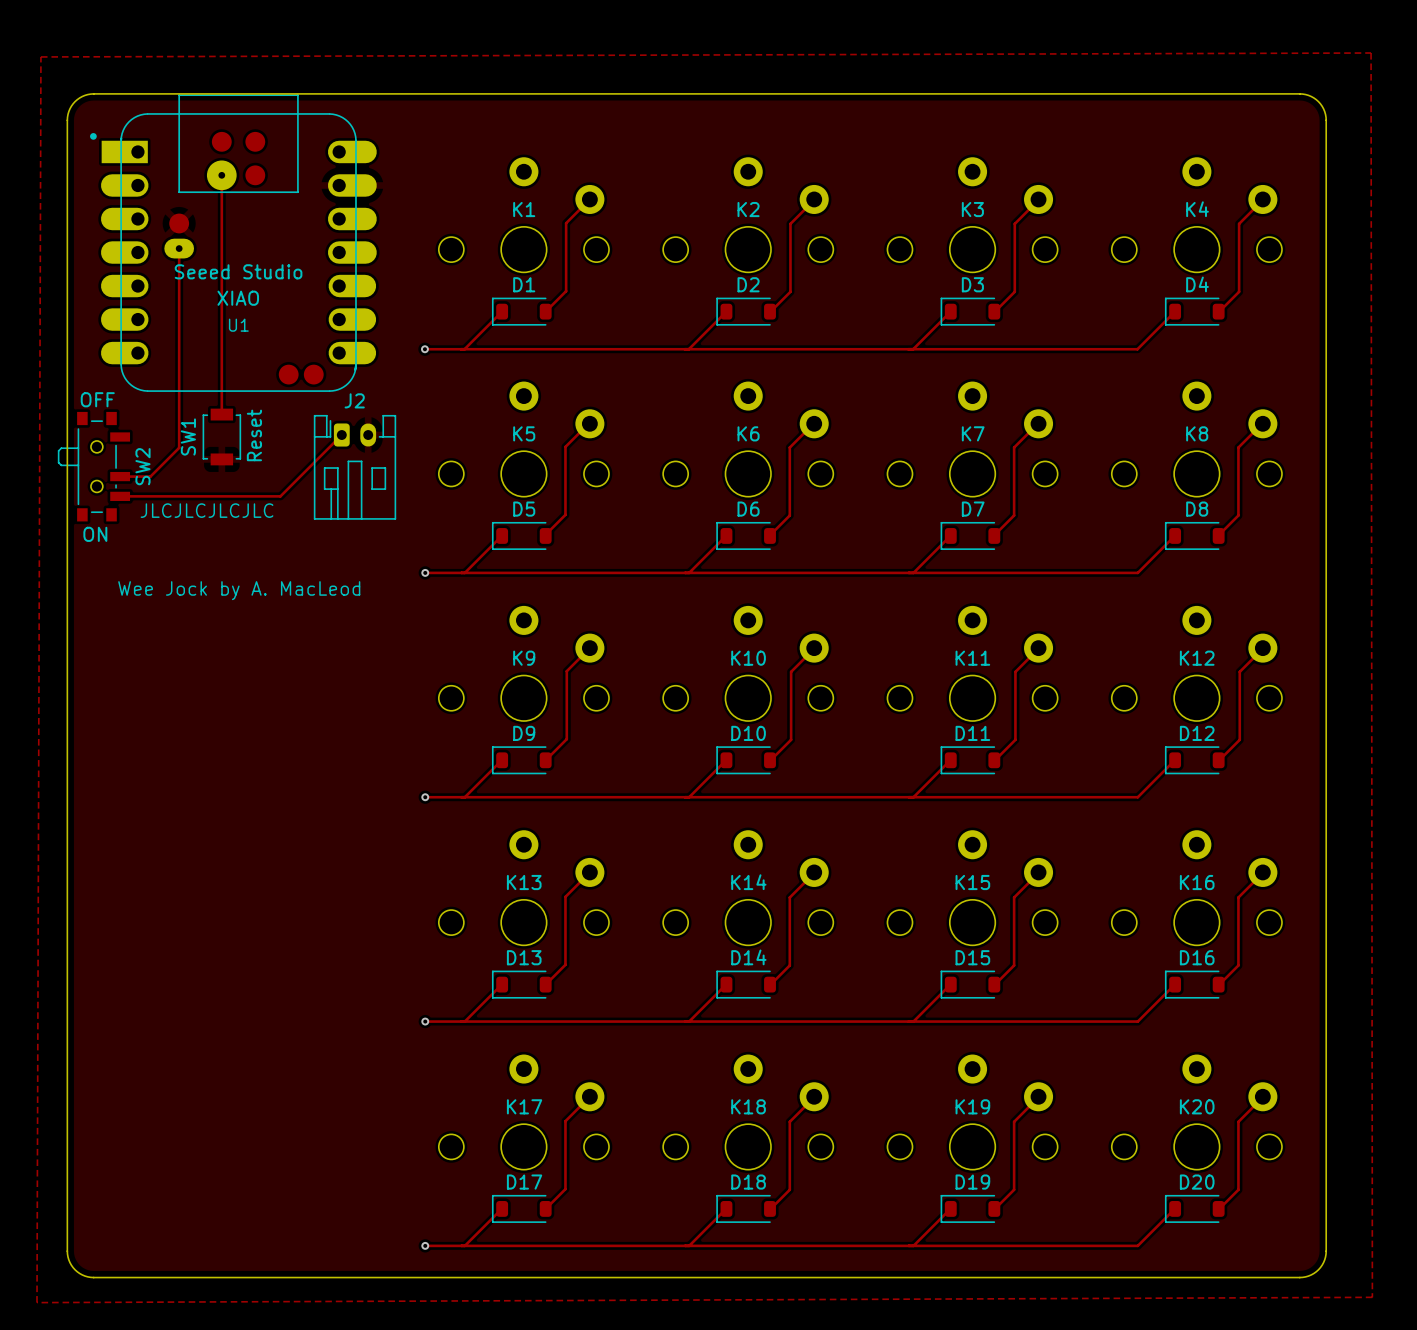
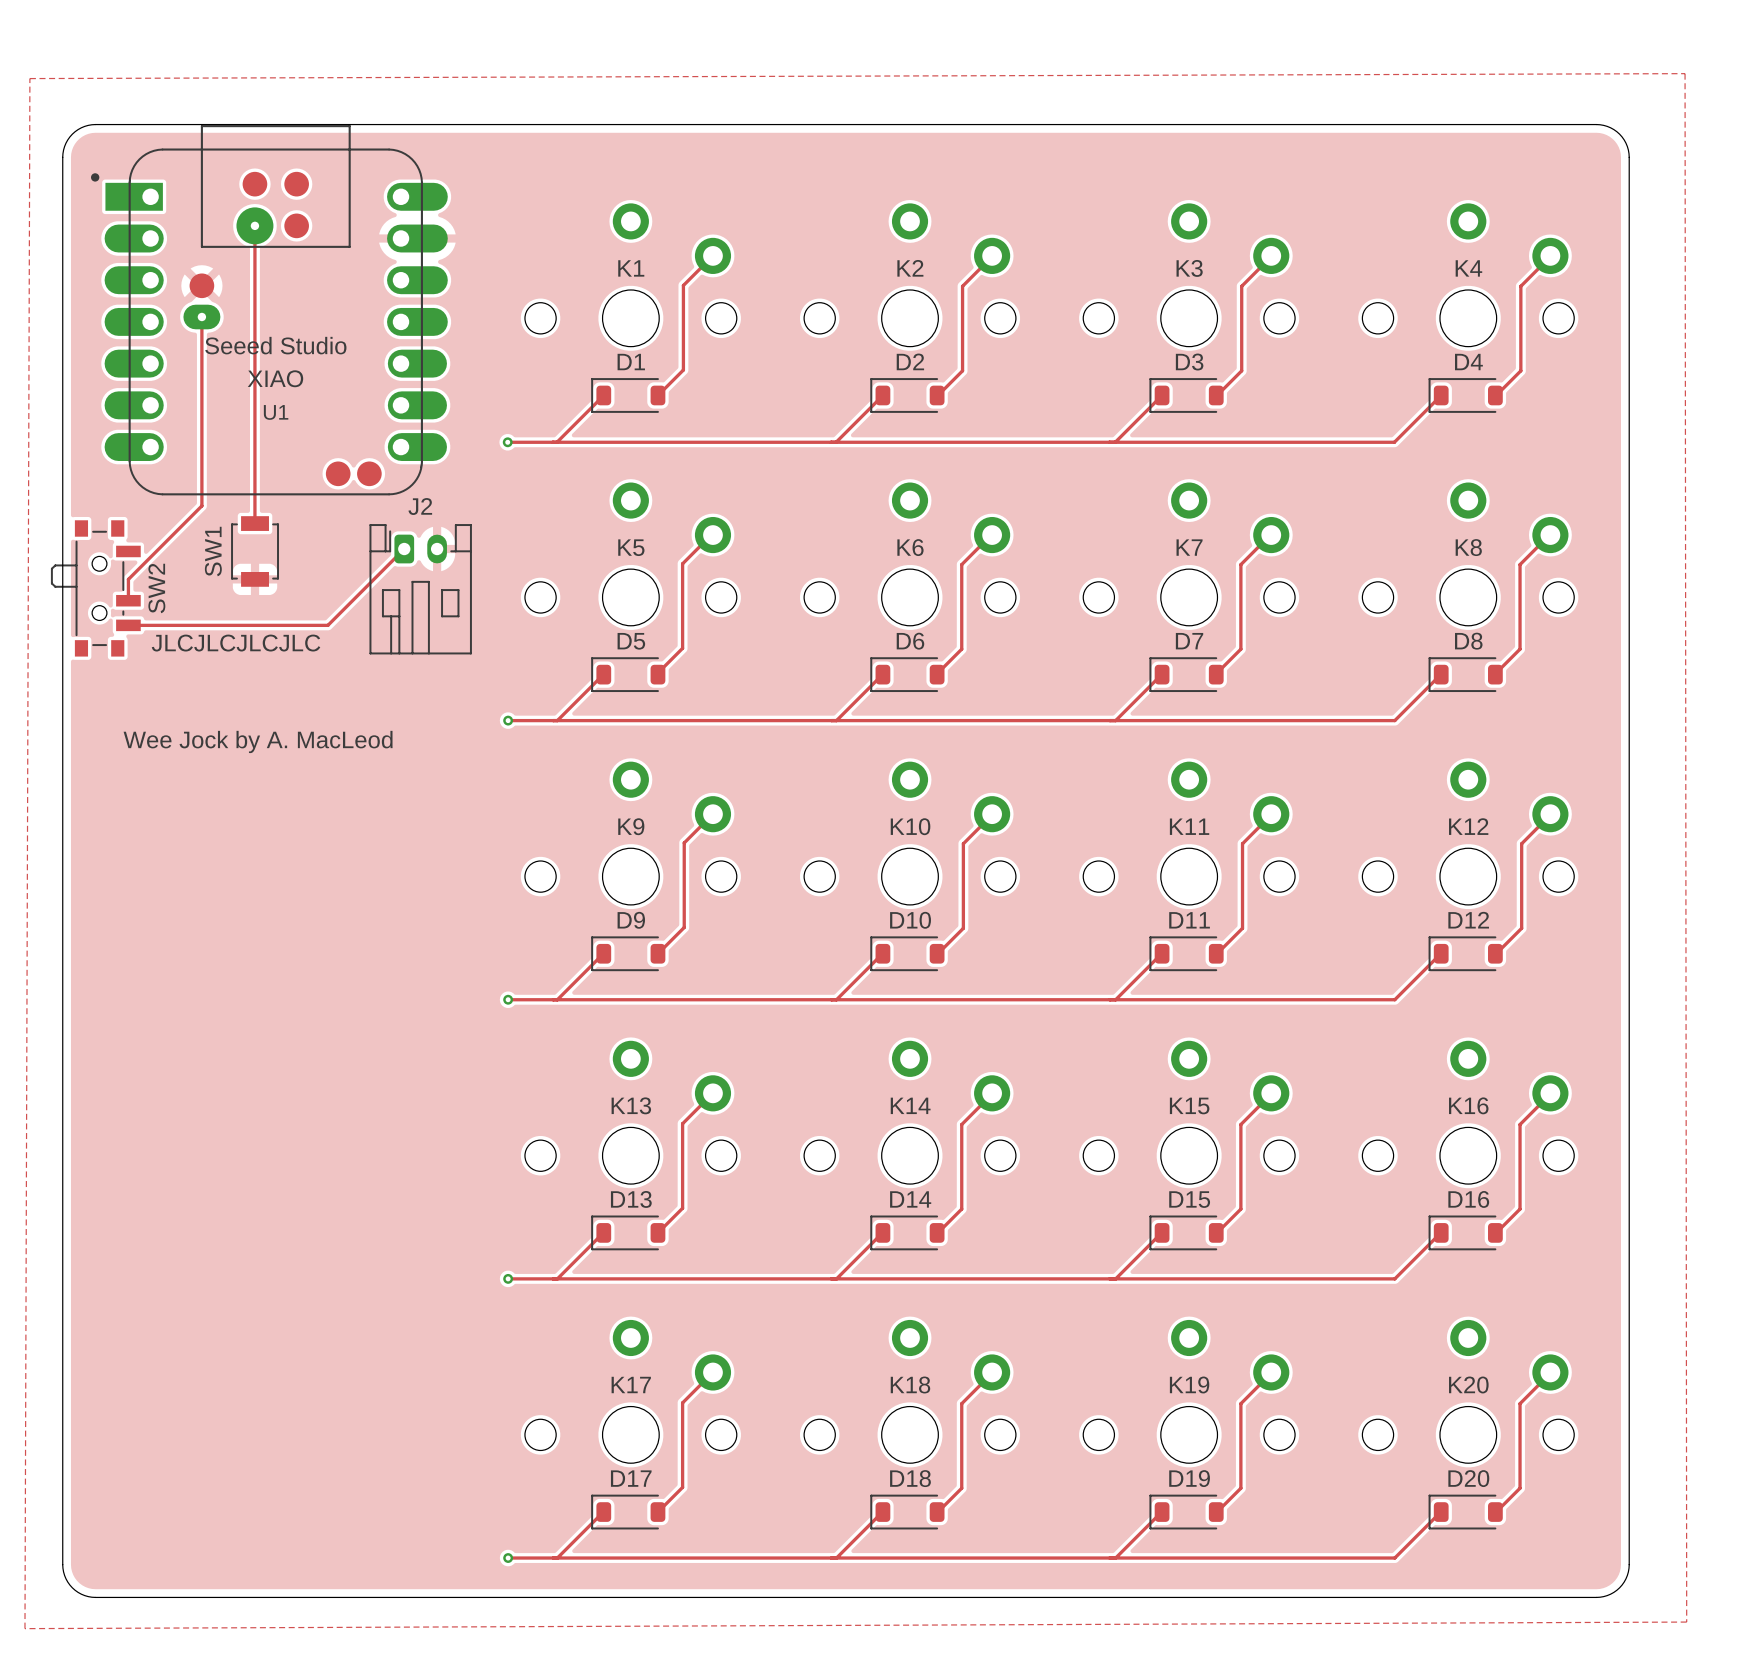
text: OFF (97, 399) -> none
track: (179, 400) (179, 447) (150, 476) (120, 476) -> (201, 505) (128, 579) (128, 600)
text: Reset (254, 435) -> none
text: ON (95, 534) -> none

